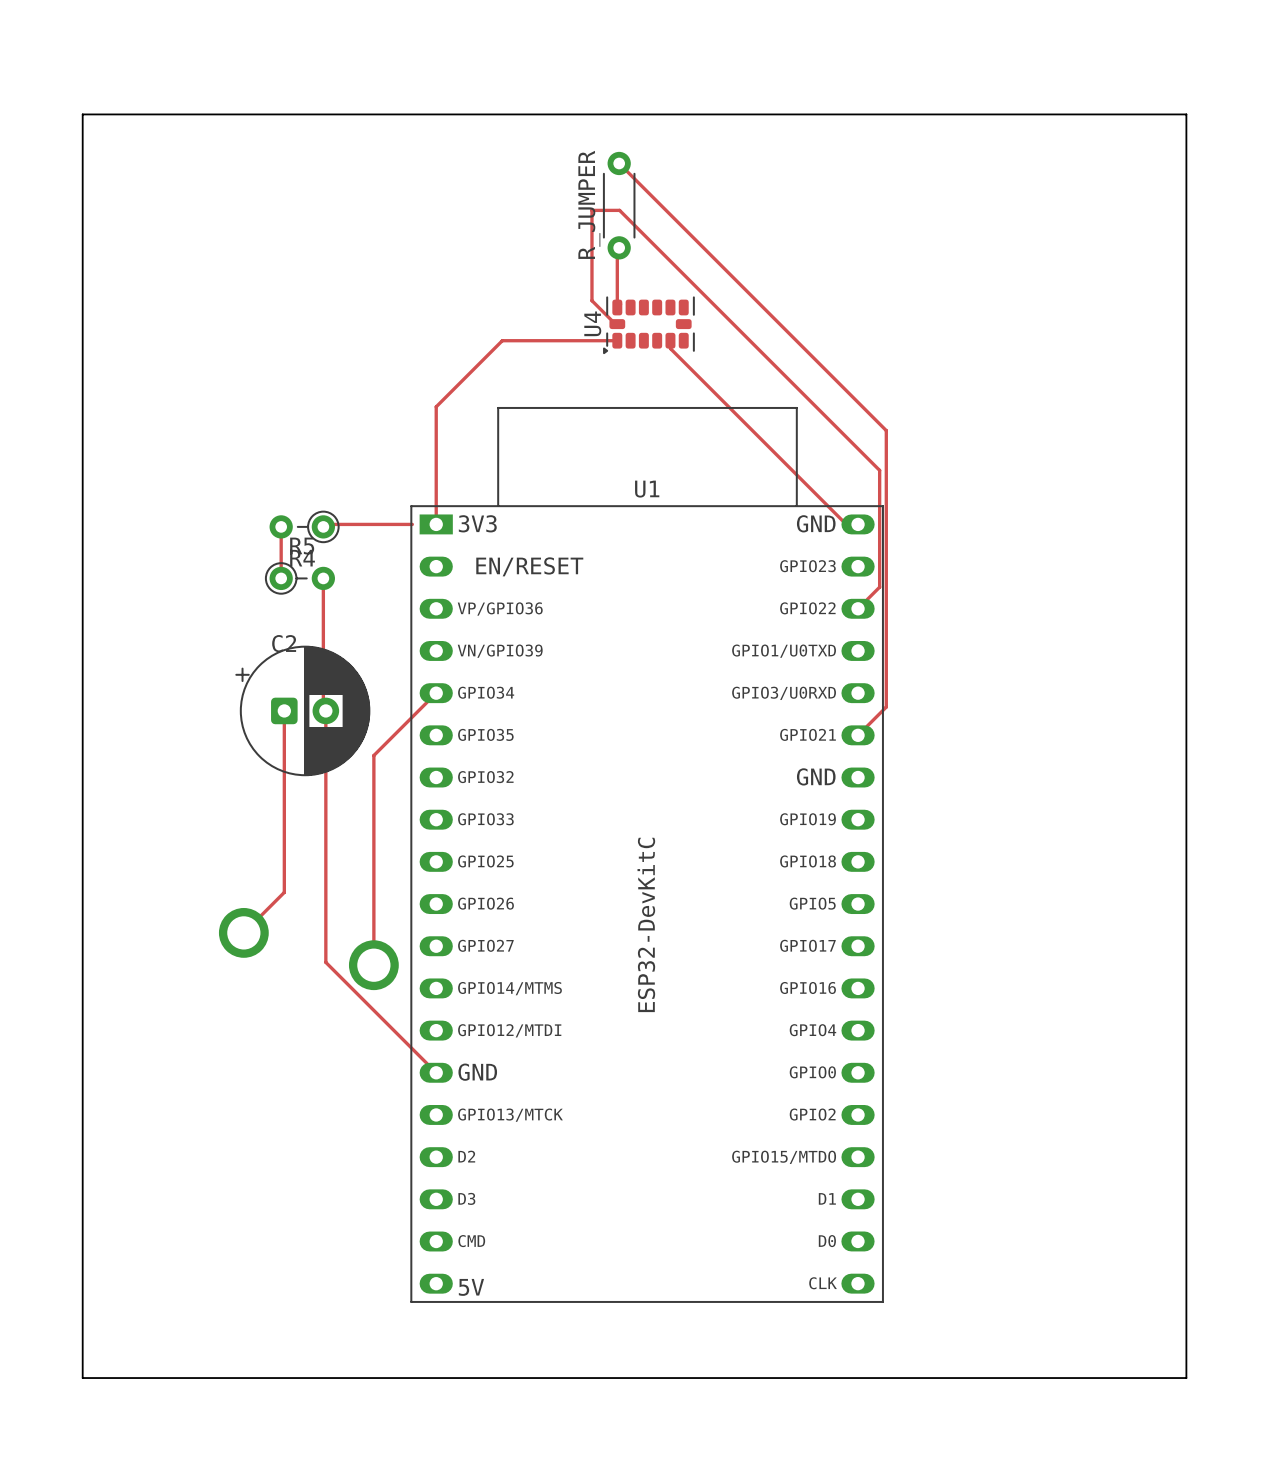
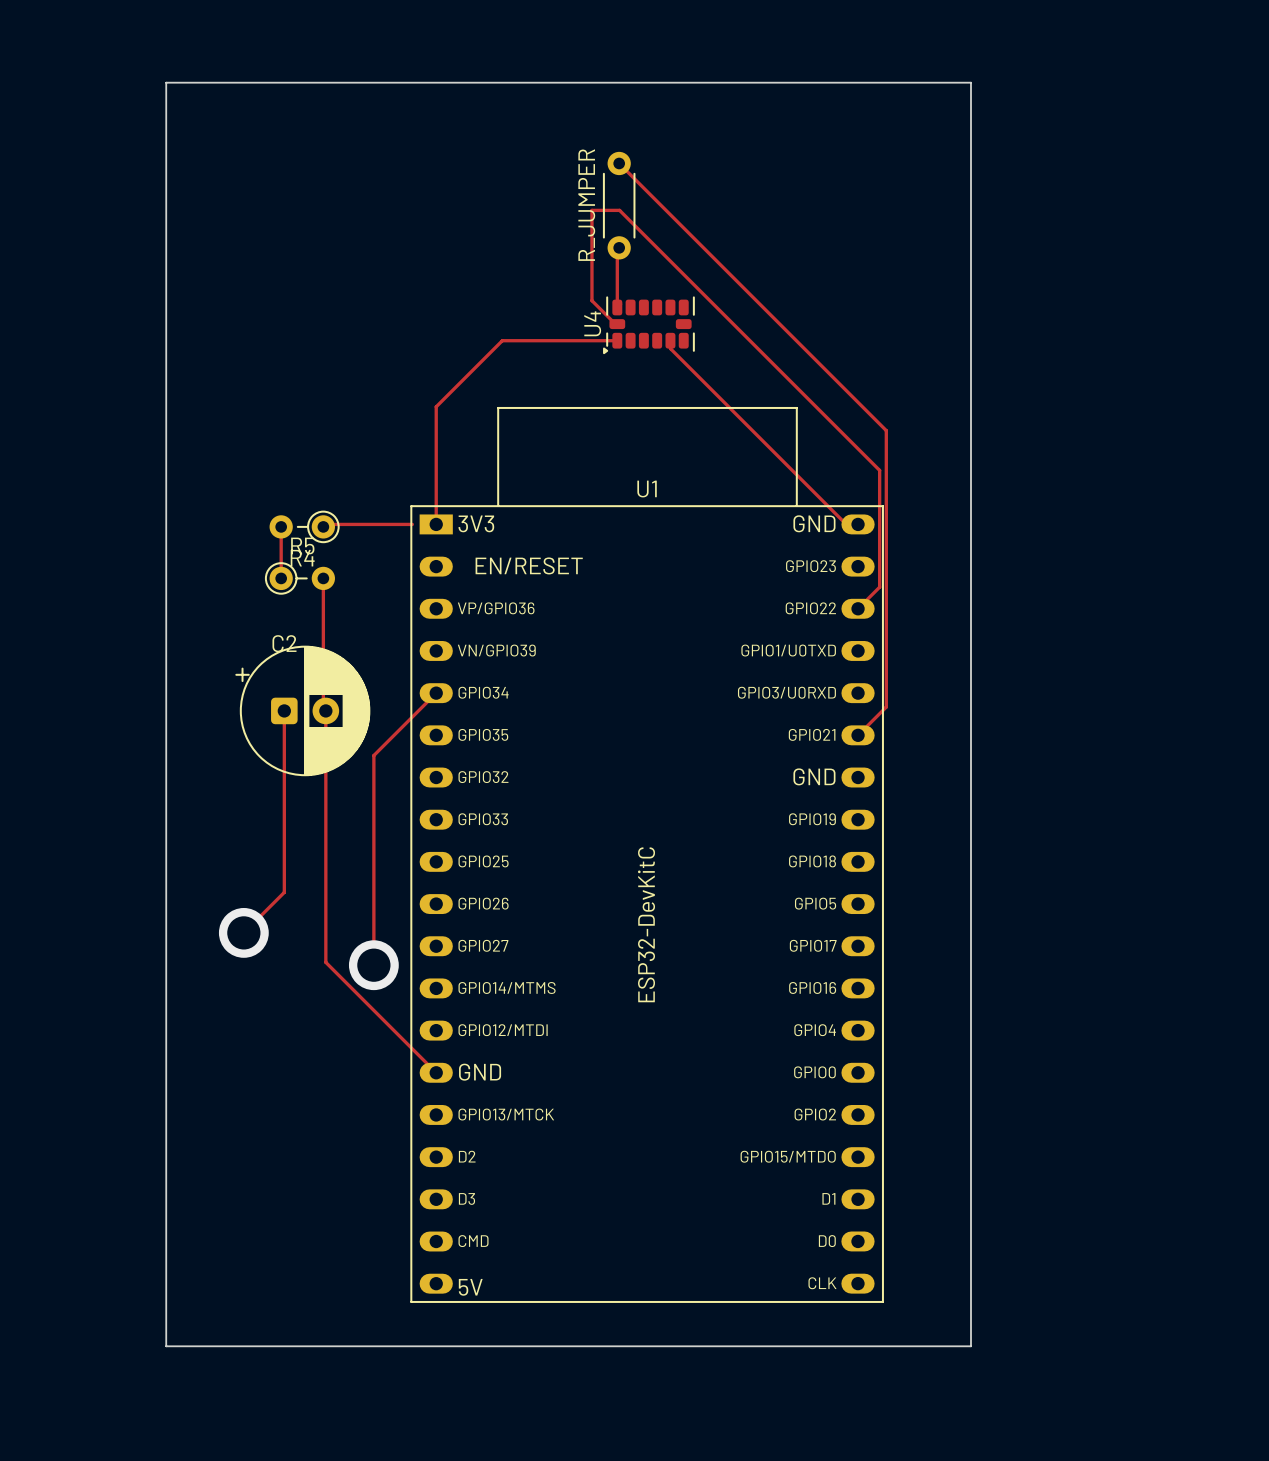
board edge: (82, 114) (1186, 114) (1186, 1378) (82, 1378) (82, 114) -> (166, 82) (166, 1346) (971, 1346) (971, 82) (166, 82)

